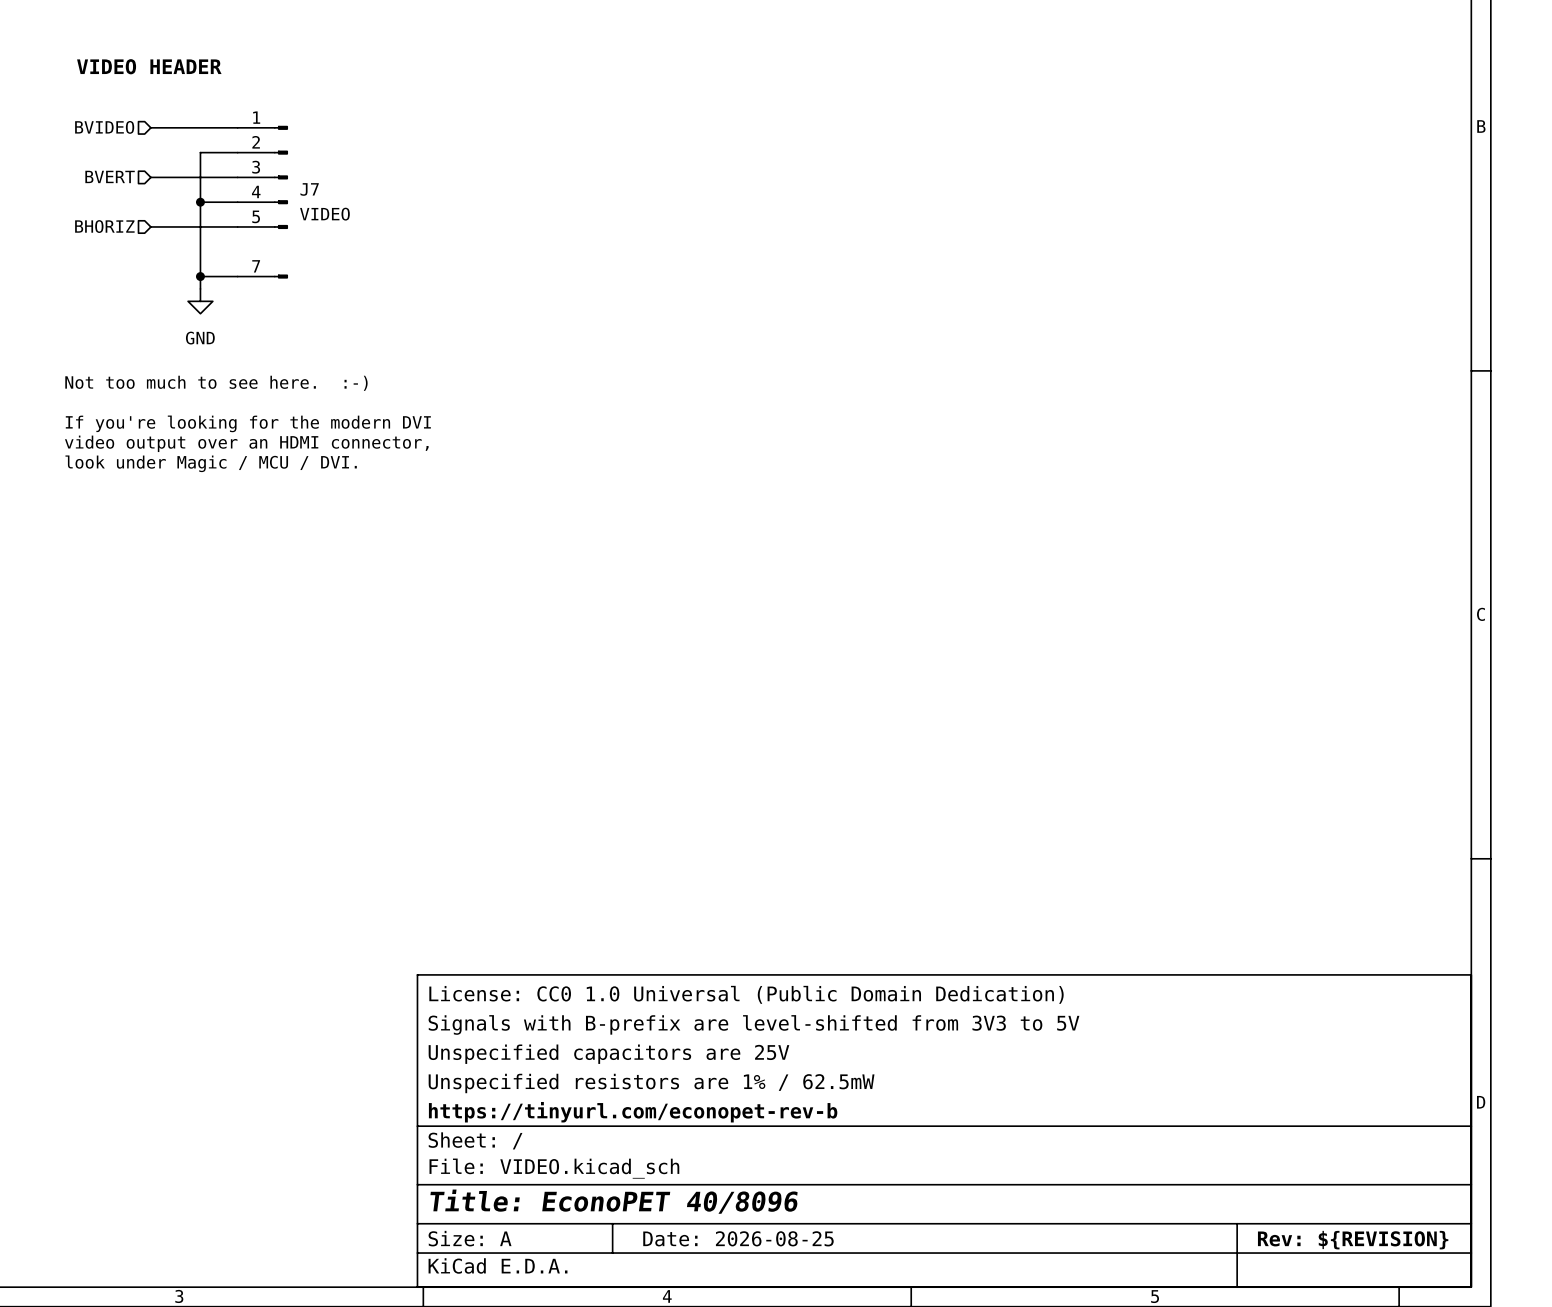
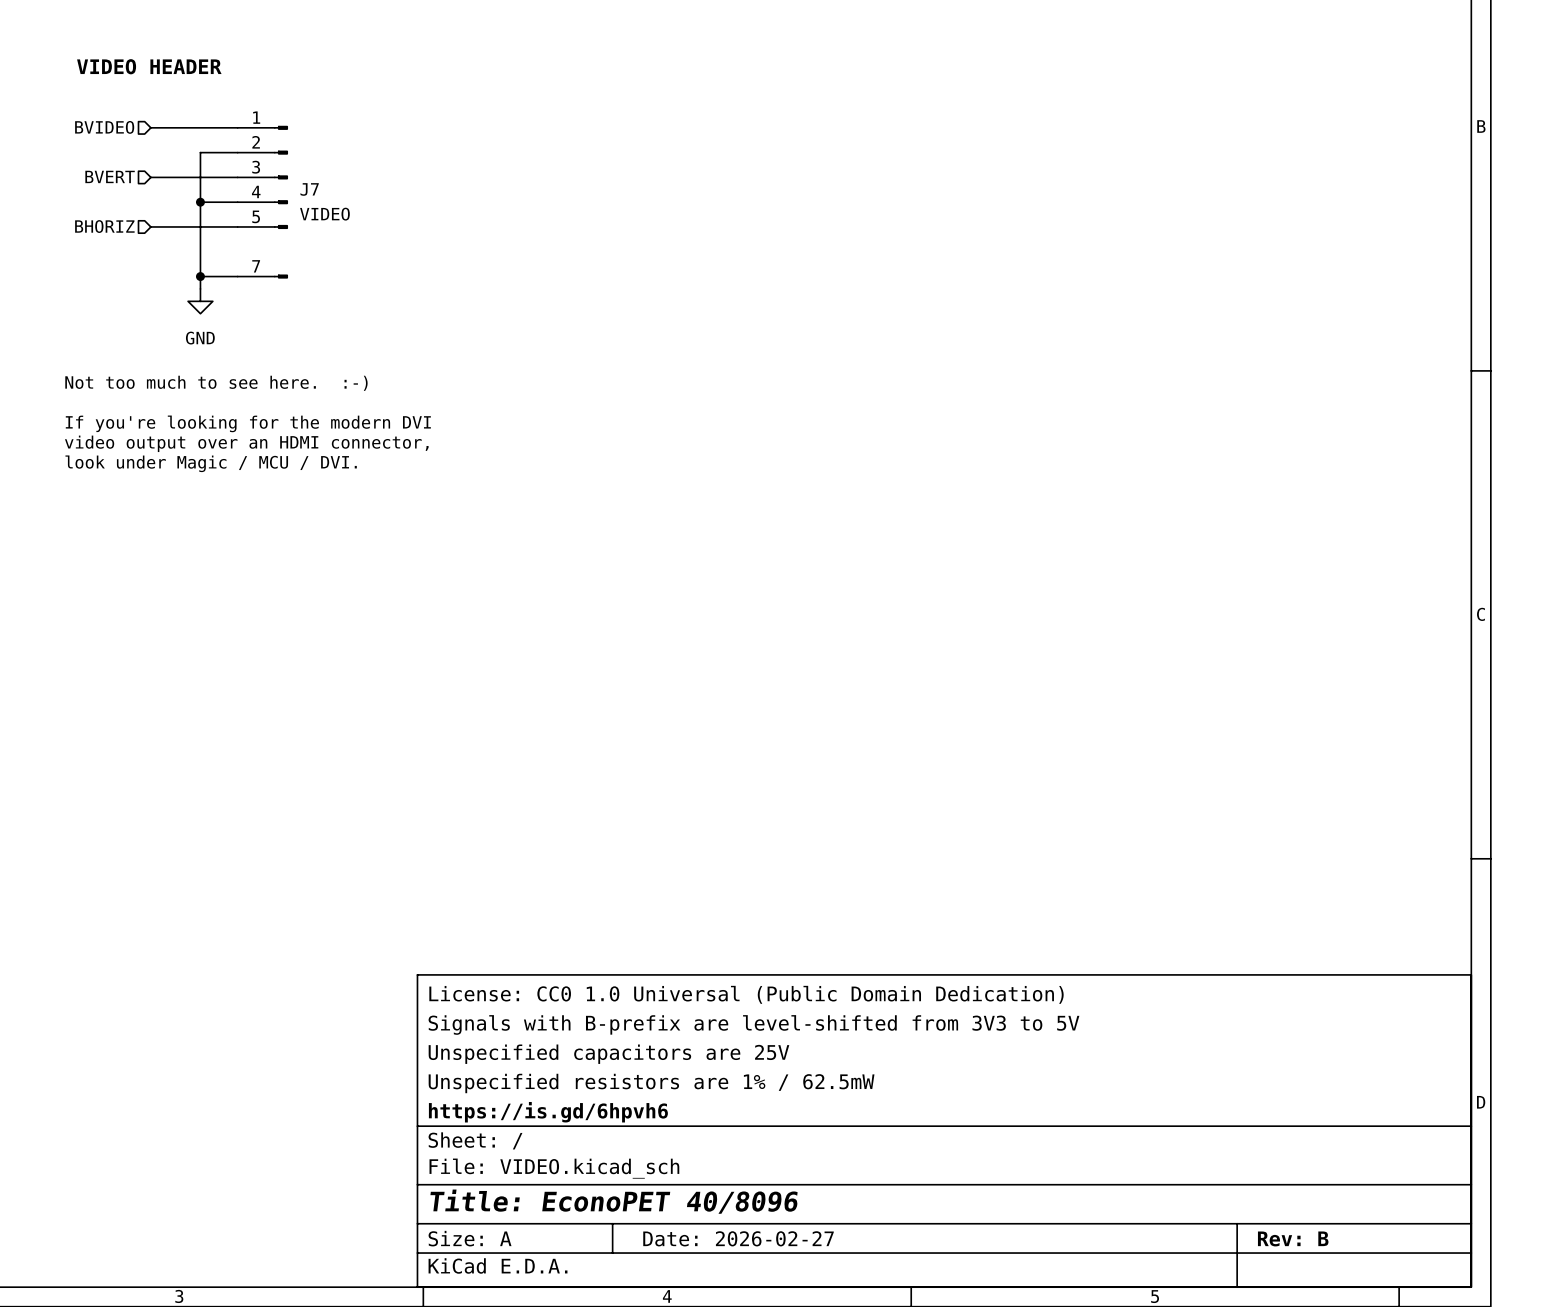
title block: https://tinyurl.com/econopet-rev-b (633, 1112) -> https://is.gd/6hpvh6 (548, 1112)
title block: Date: 2026-08-25 (738, 1238) -> Date: 2026-02-27 (738, 1238)
title block: Rev: ${REVISION} (1353, 1240) -> Rev: B (1293, 1238)

